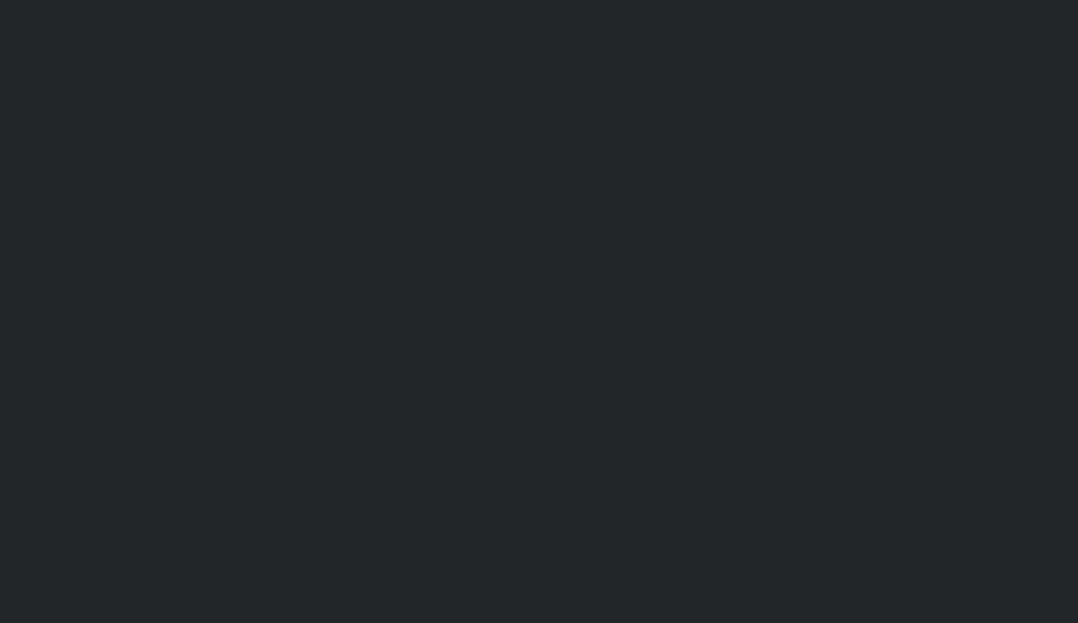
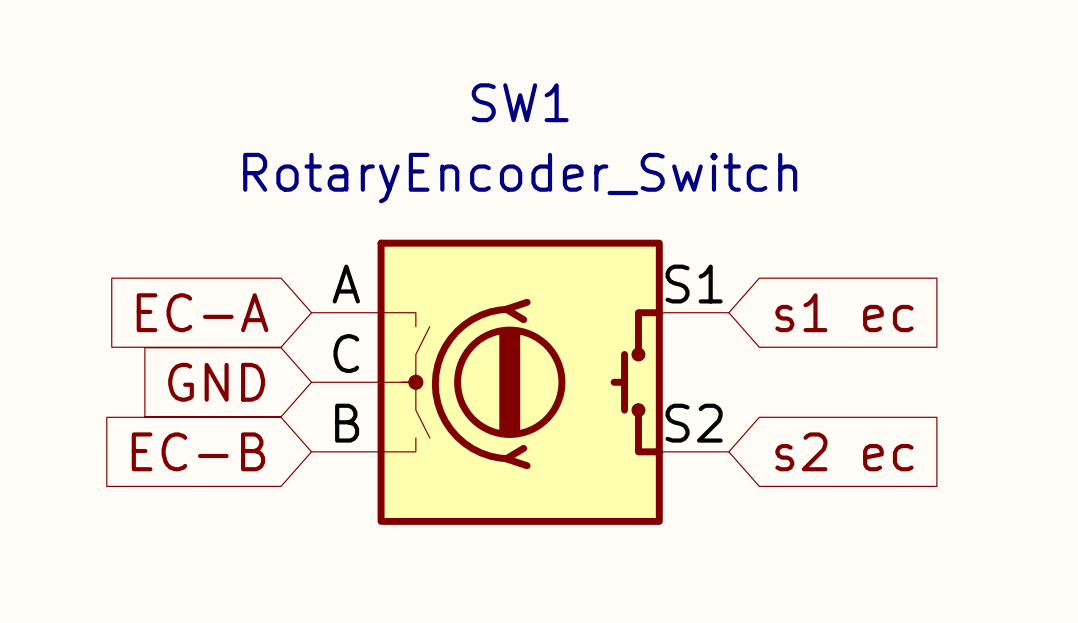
global label: none -> EC-A (202, 312)
global label: none -> s1 ec (844, 312)
global label: none -> GND (216, 382)
SW1: none -> RotaryEncoder_Switch (520, 382)
global label: none -> EC-B (198, 451)
global label: none -> s2 ec (844, 451)

